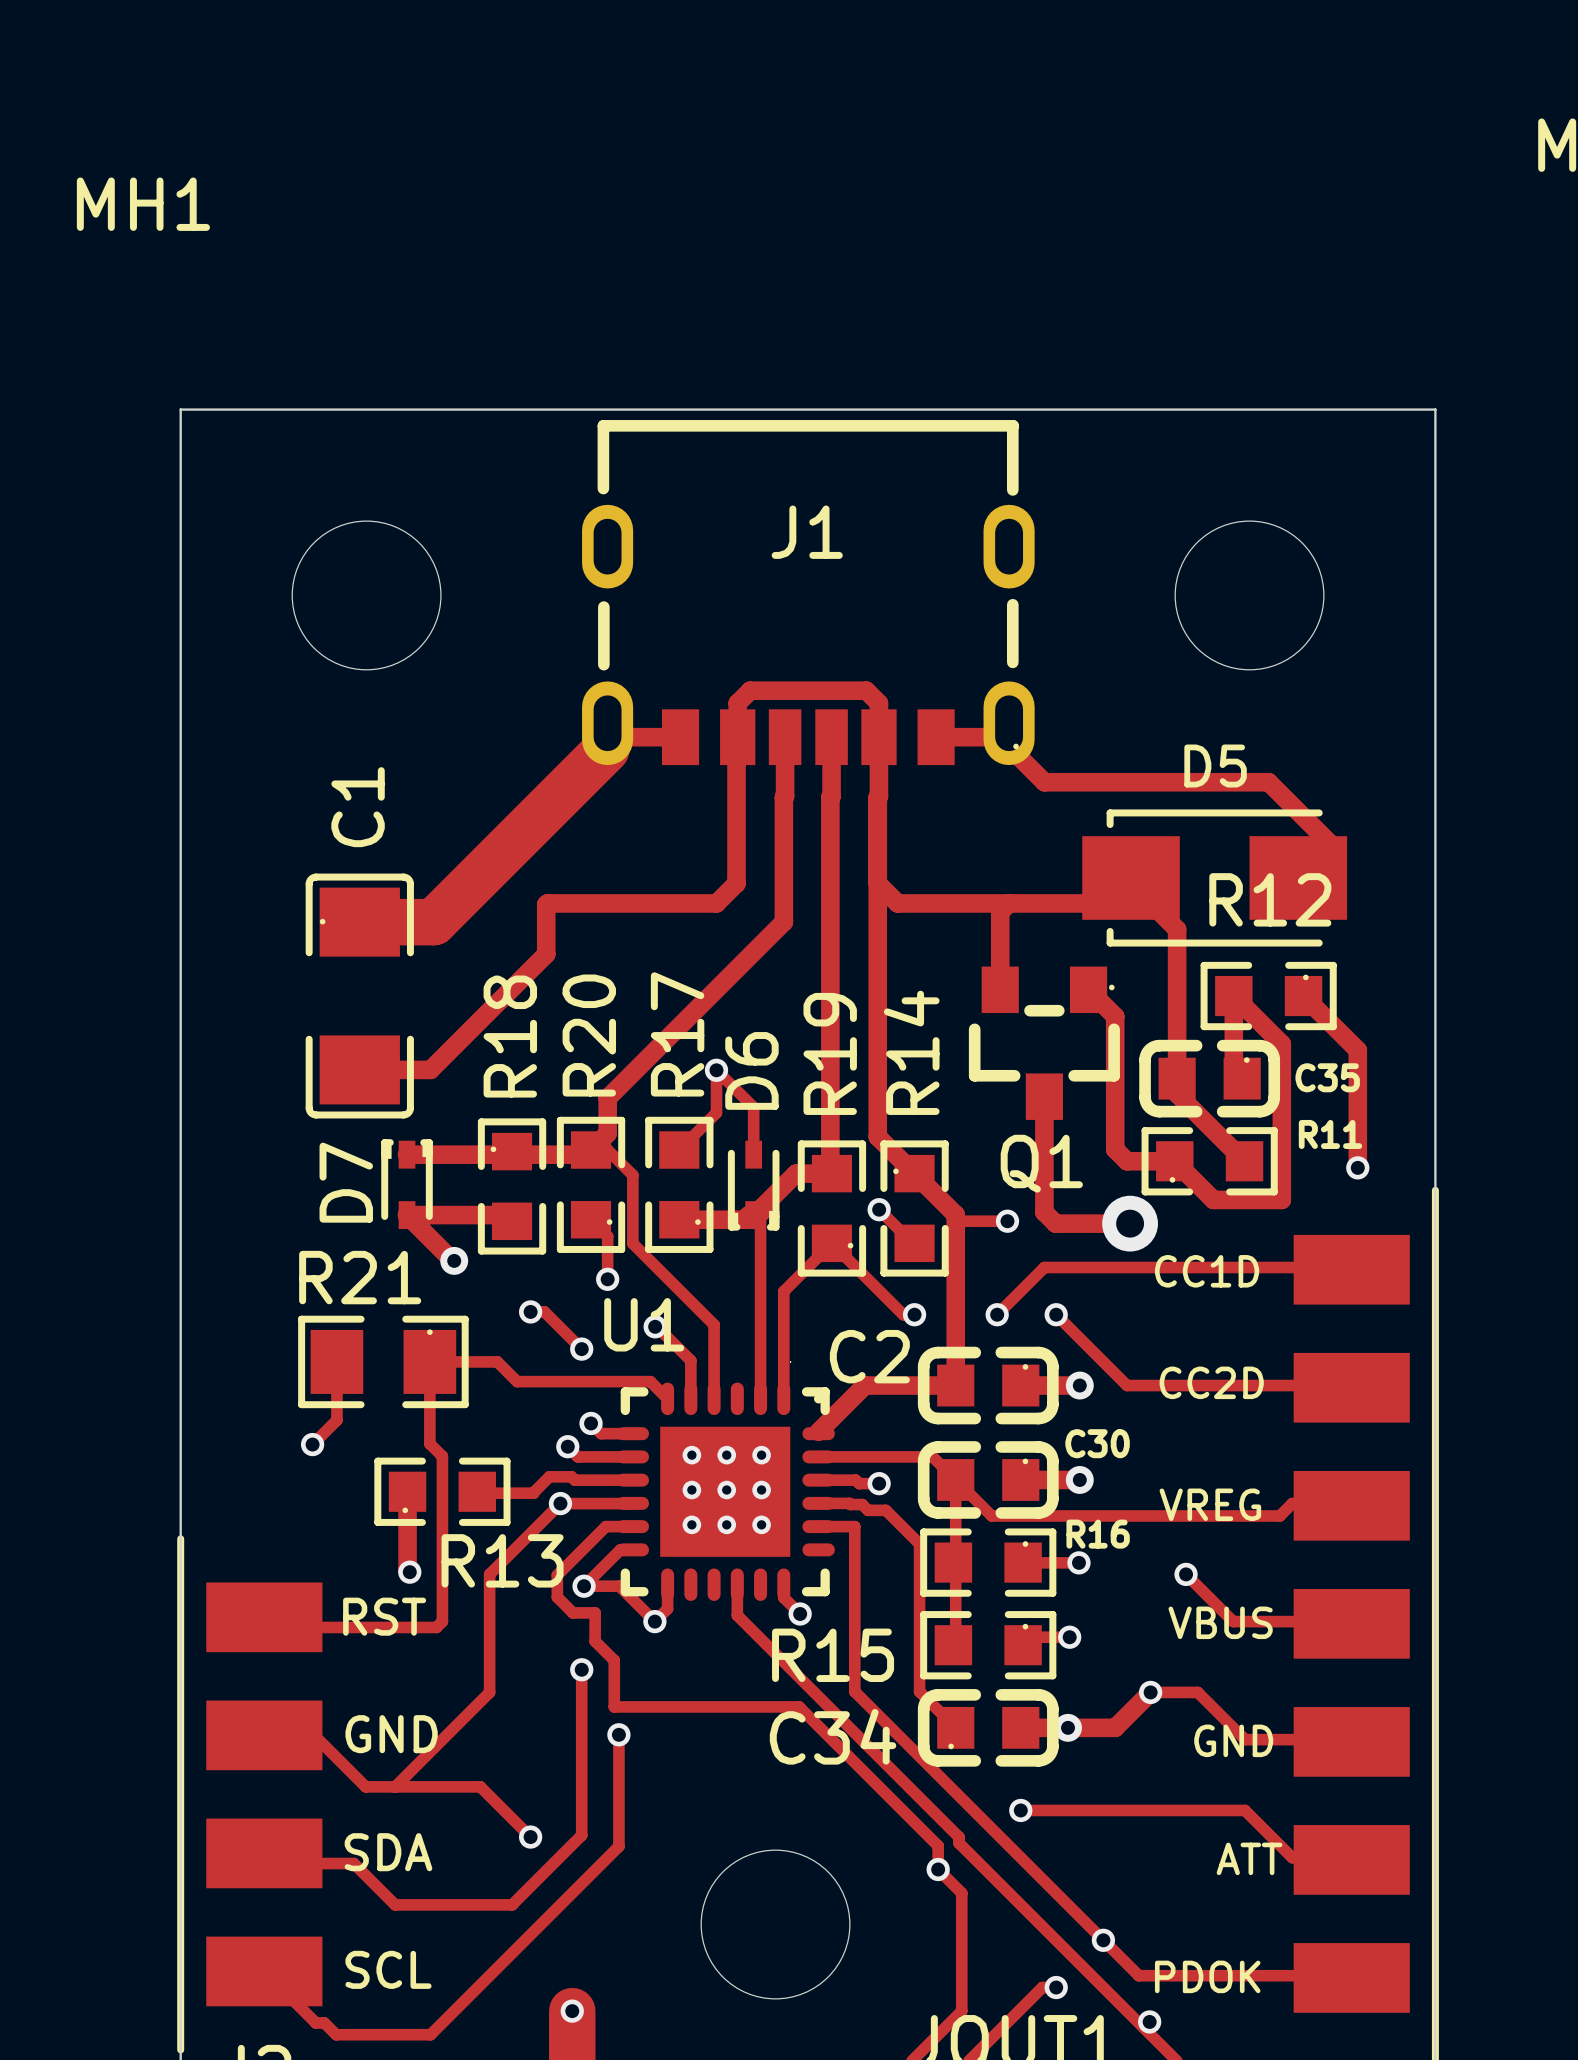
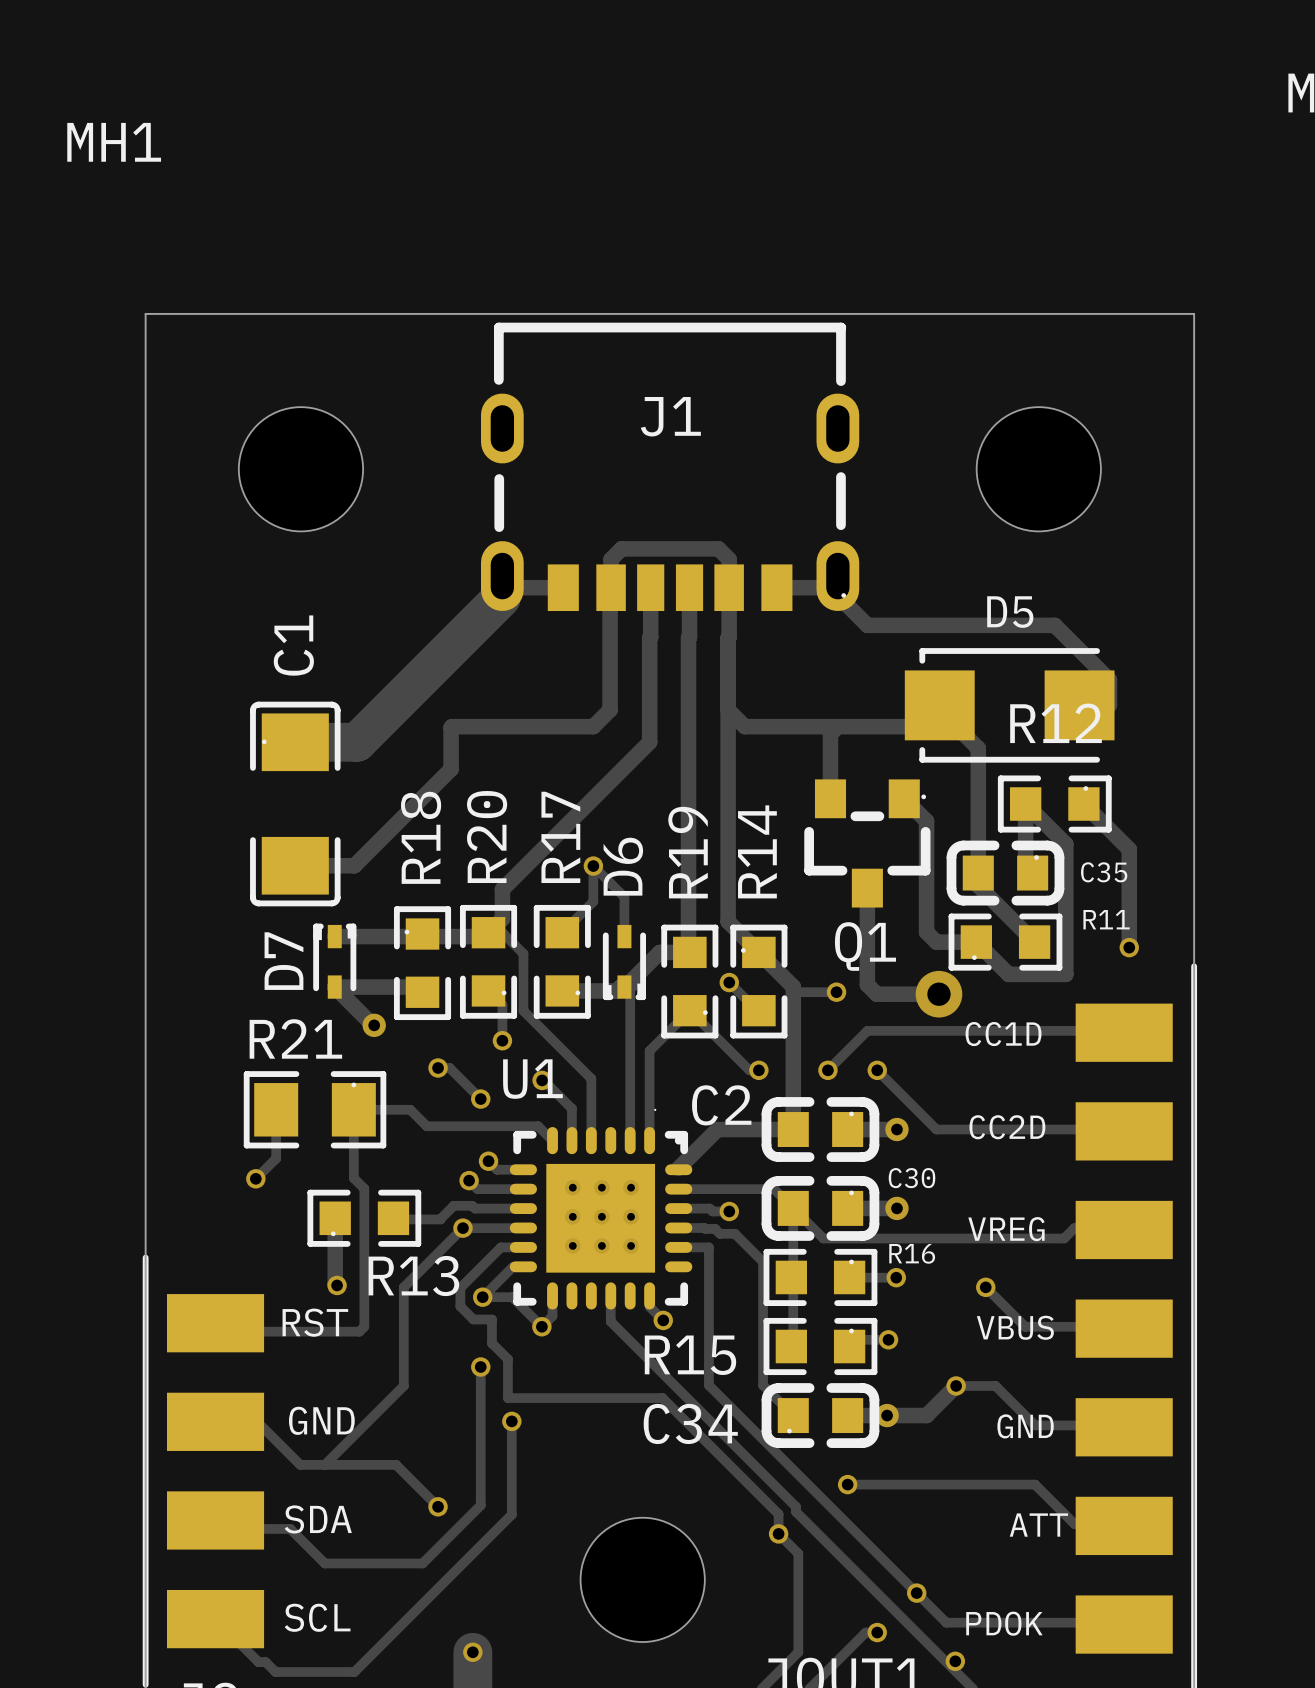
D5 footprint: [1082, 809, 1348, 947] -> [904, 648, 1115, 763]

